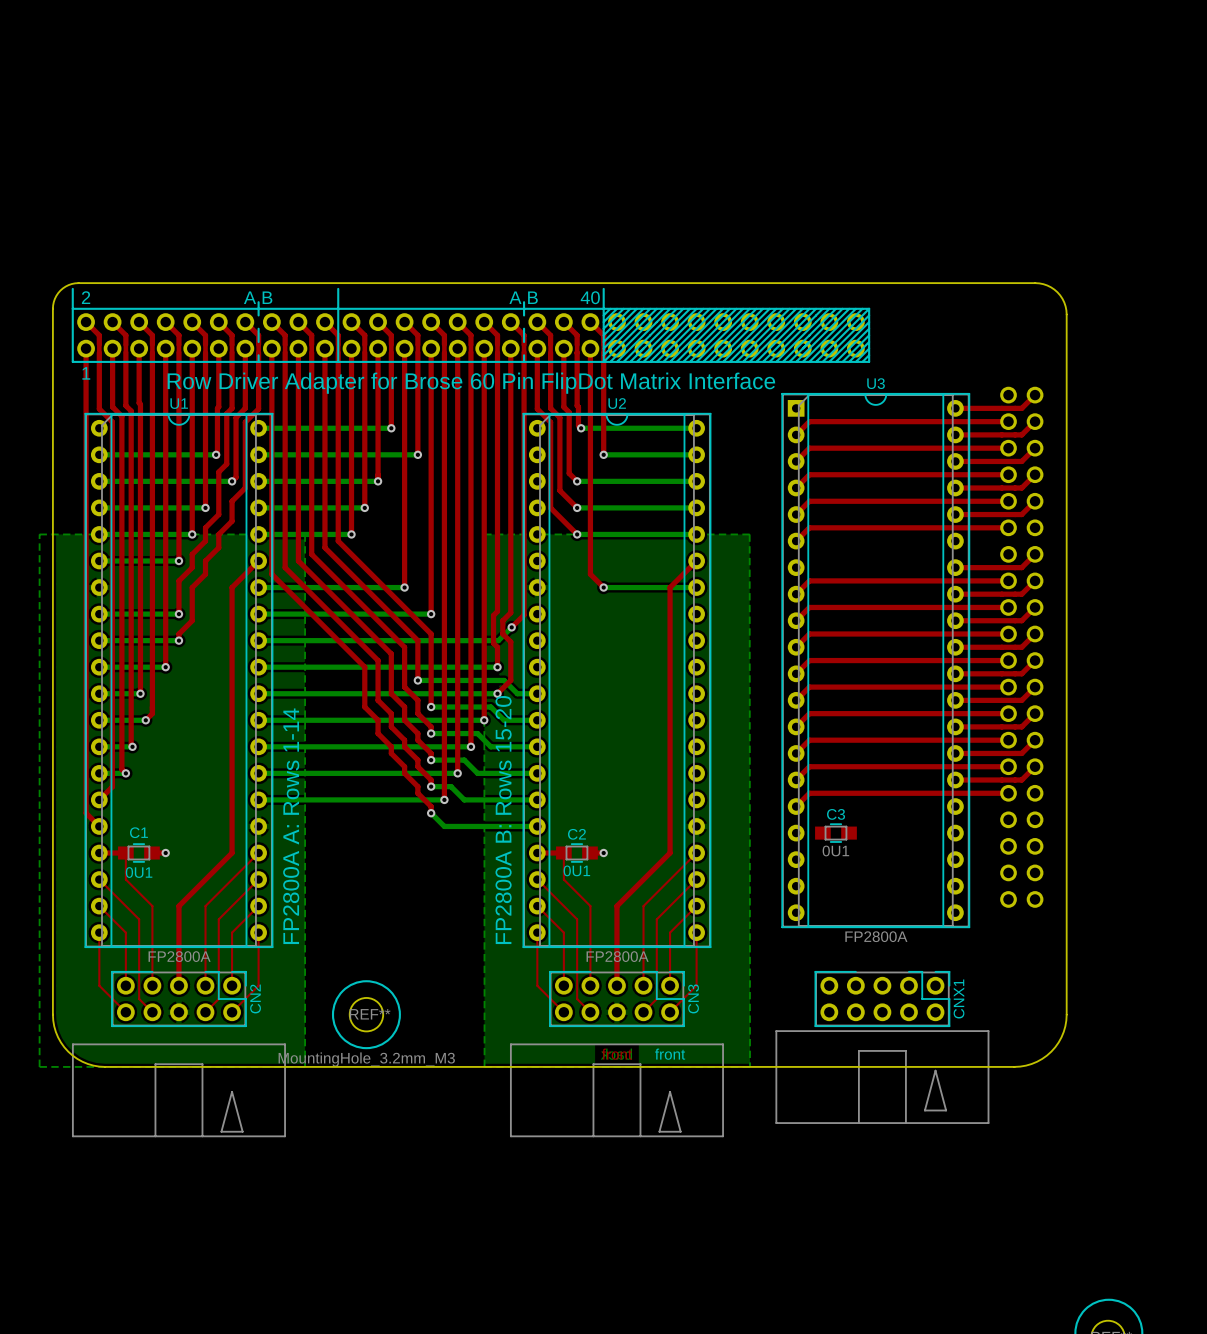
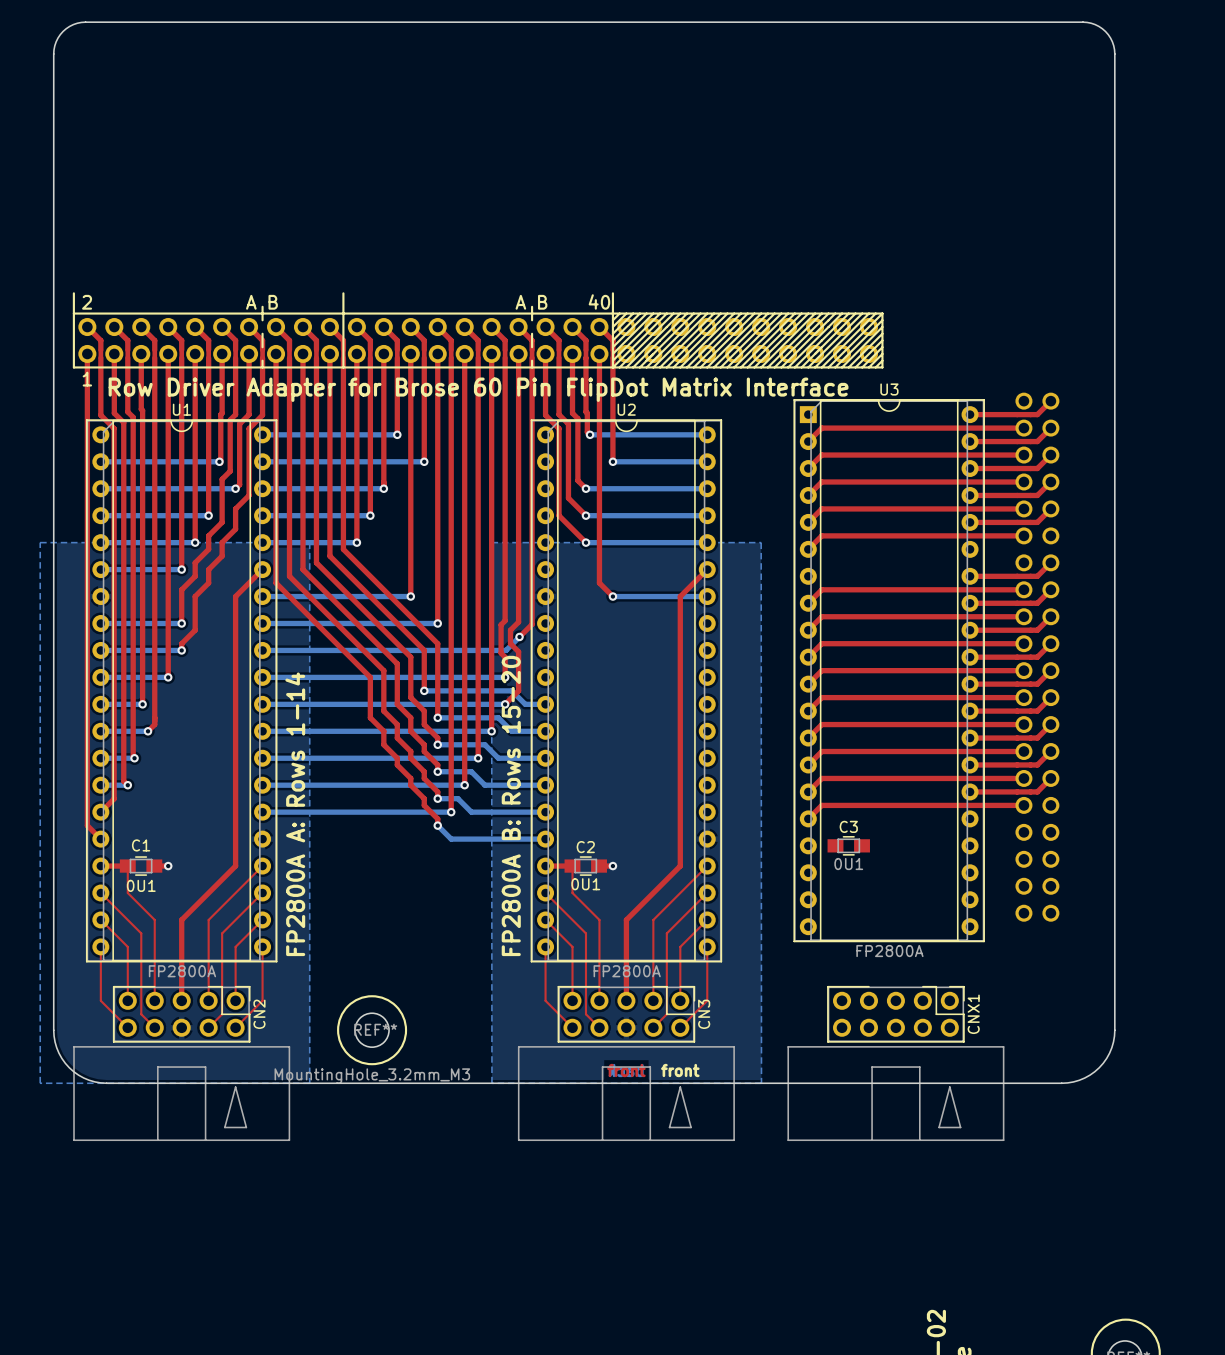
board edge: (52, 308) (54, 298) (60, 290) (68, 285) (78, 283) (1035, 283) (1043, 284) (1054, 289) (1064, 302) (1066, 314) (1066, 1014) (1063, 1031) (1051, 1051) (1031, 1064) (1014, 1066) -> (53, 313) (54, 49) (56, 41) (63, 31) (77, 23) (1082, 22) (1091, 23) (1102, 28) (1112, 41) (1114, 54) (1114, 1036) (1106, 1058) (1090, 1075) (1067, 1082) (1029, 1083)
CN2 footprint: [72, 971, 286, 1138] -> [73, 986, 291, 1142]
CN3 footprint: [510, 971, 724, 1138] -> [517, 986, 735, 1142]

